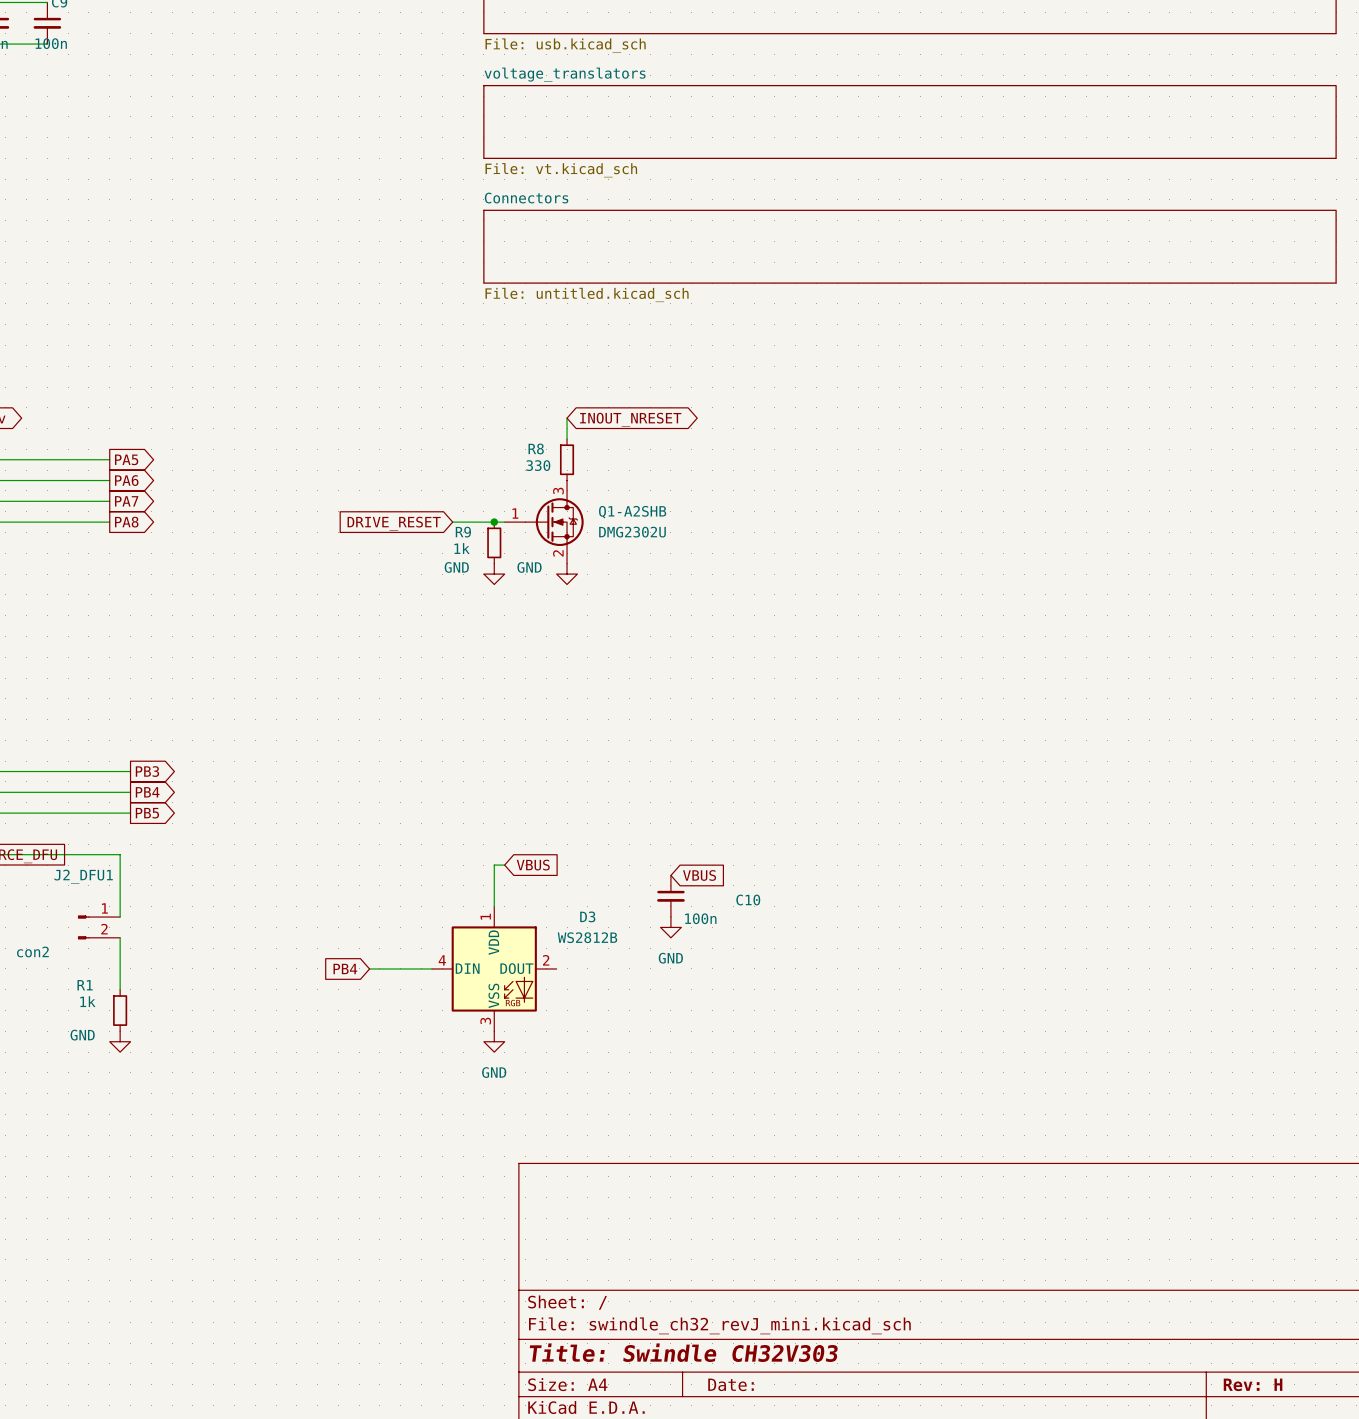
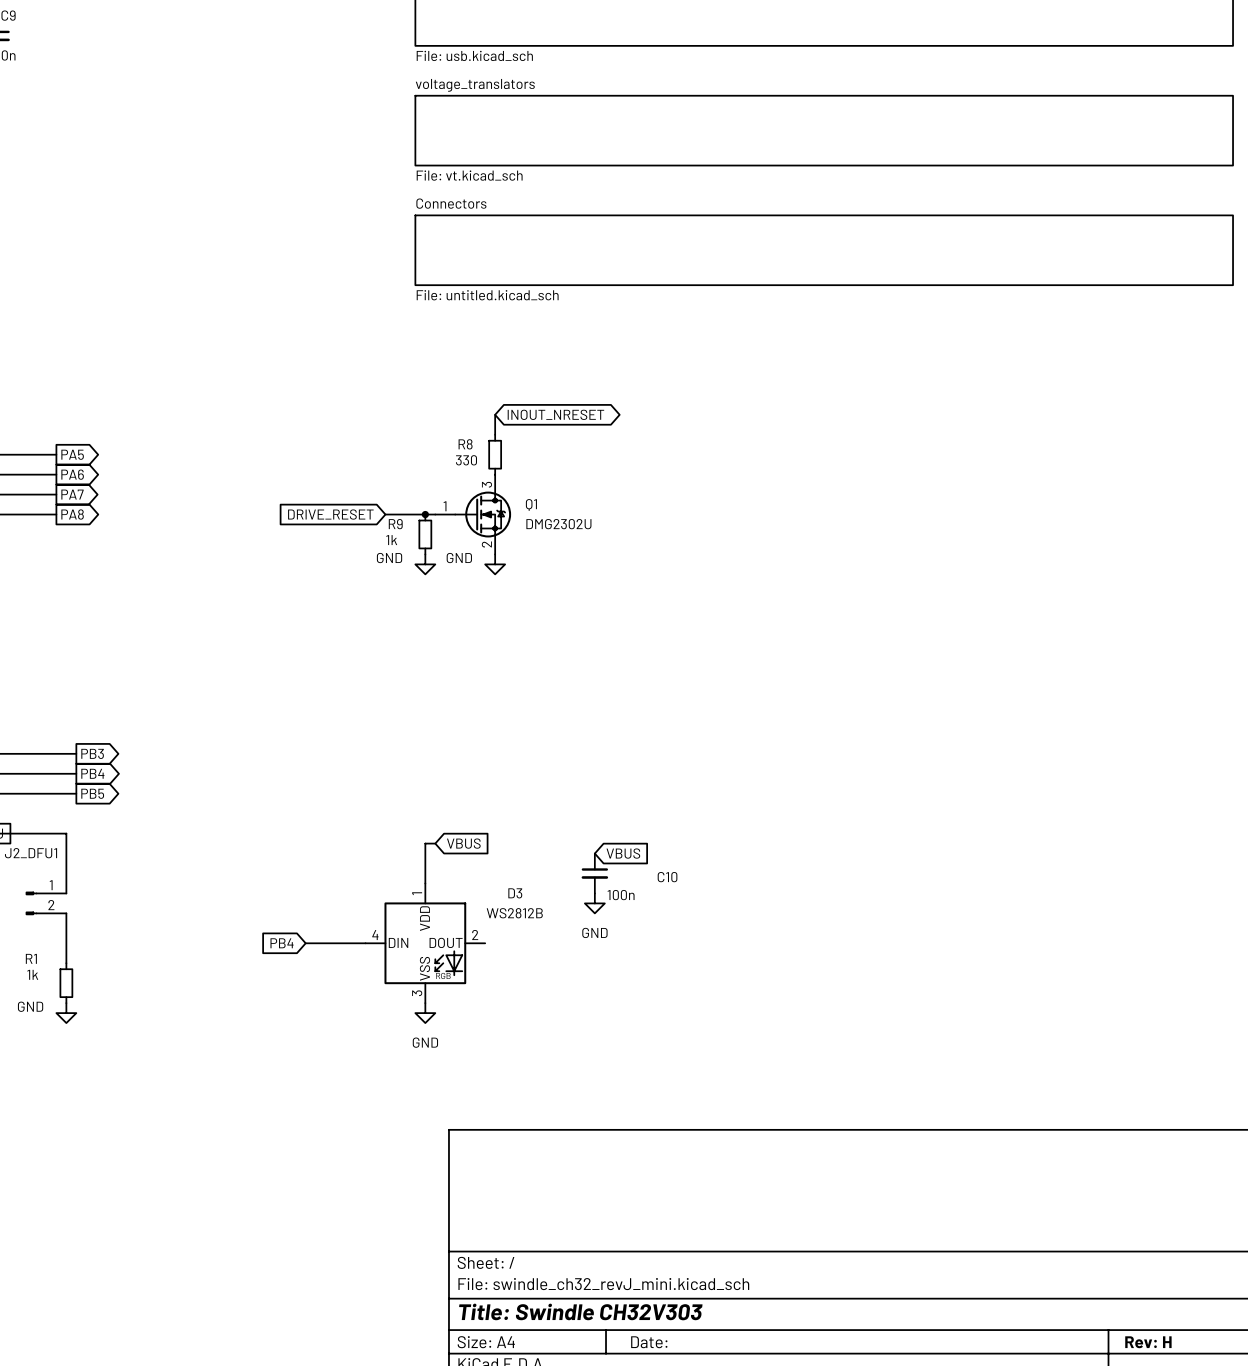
Q1-A2SHB name: Q1-A2SHB (632, 512) -> Q1 (531, 504)

